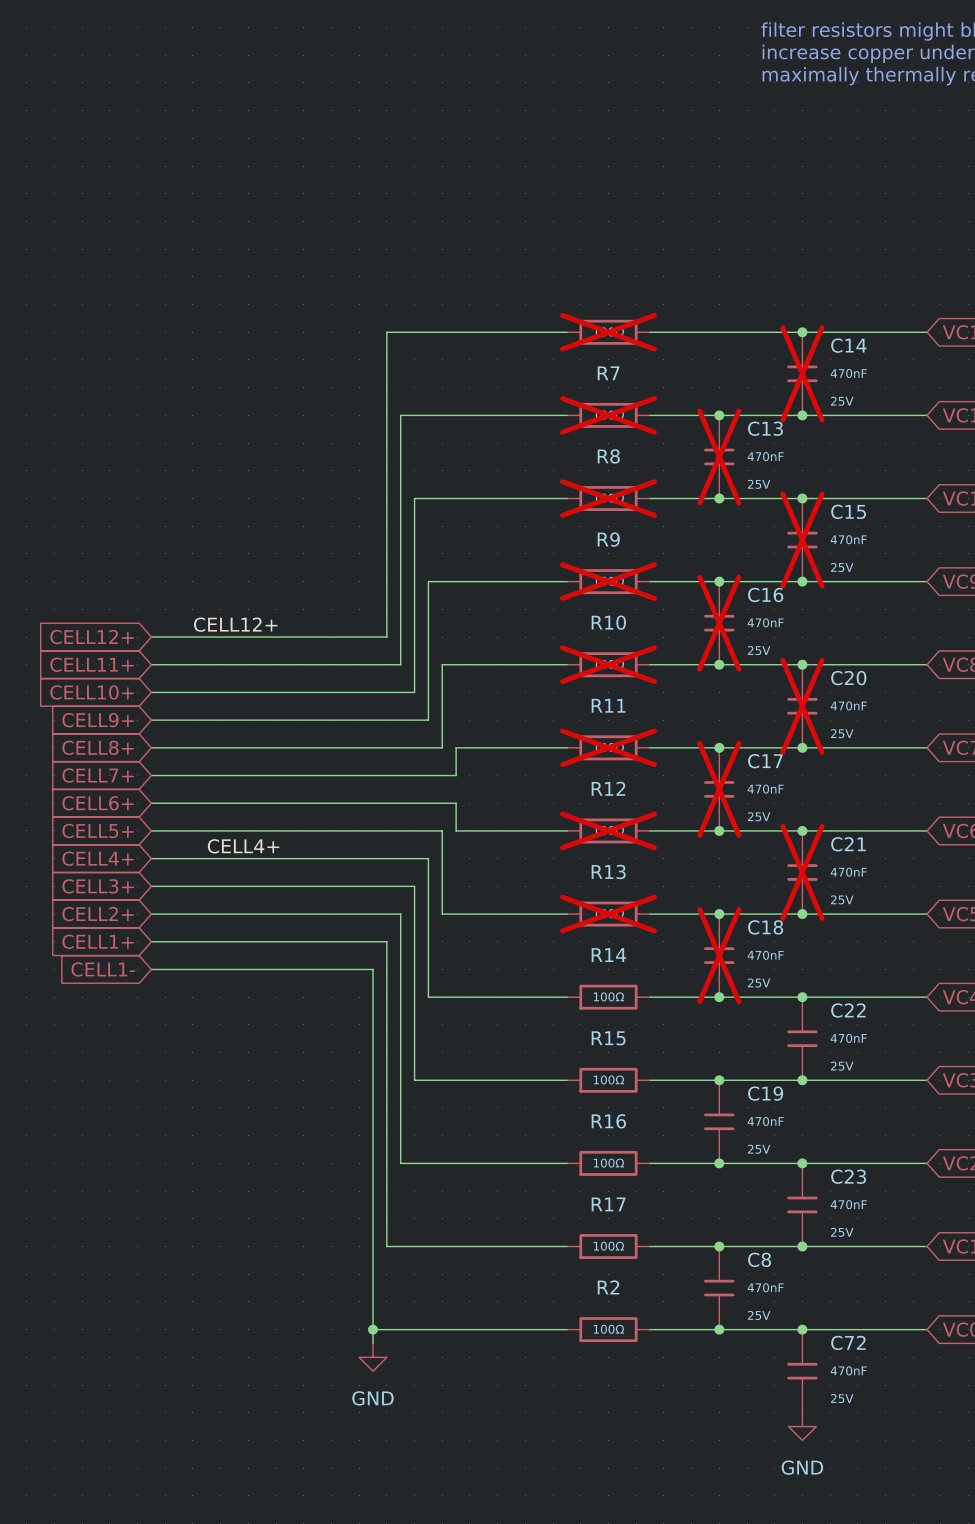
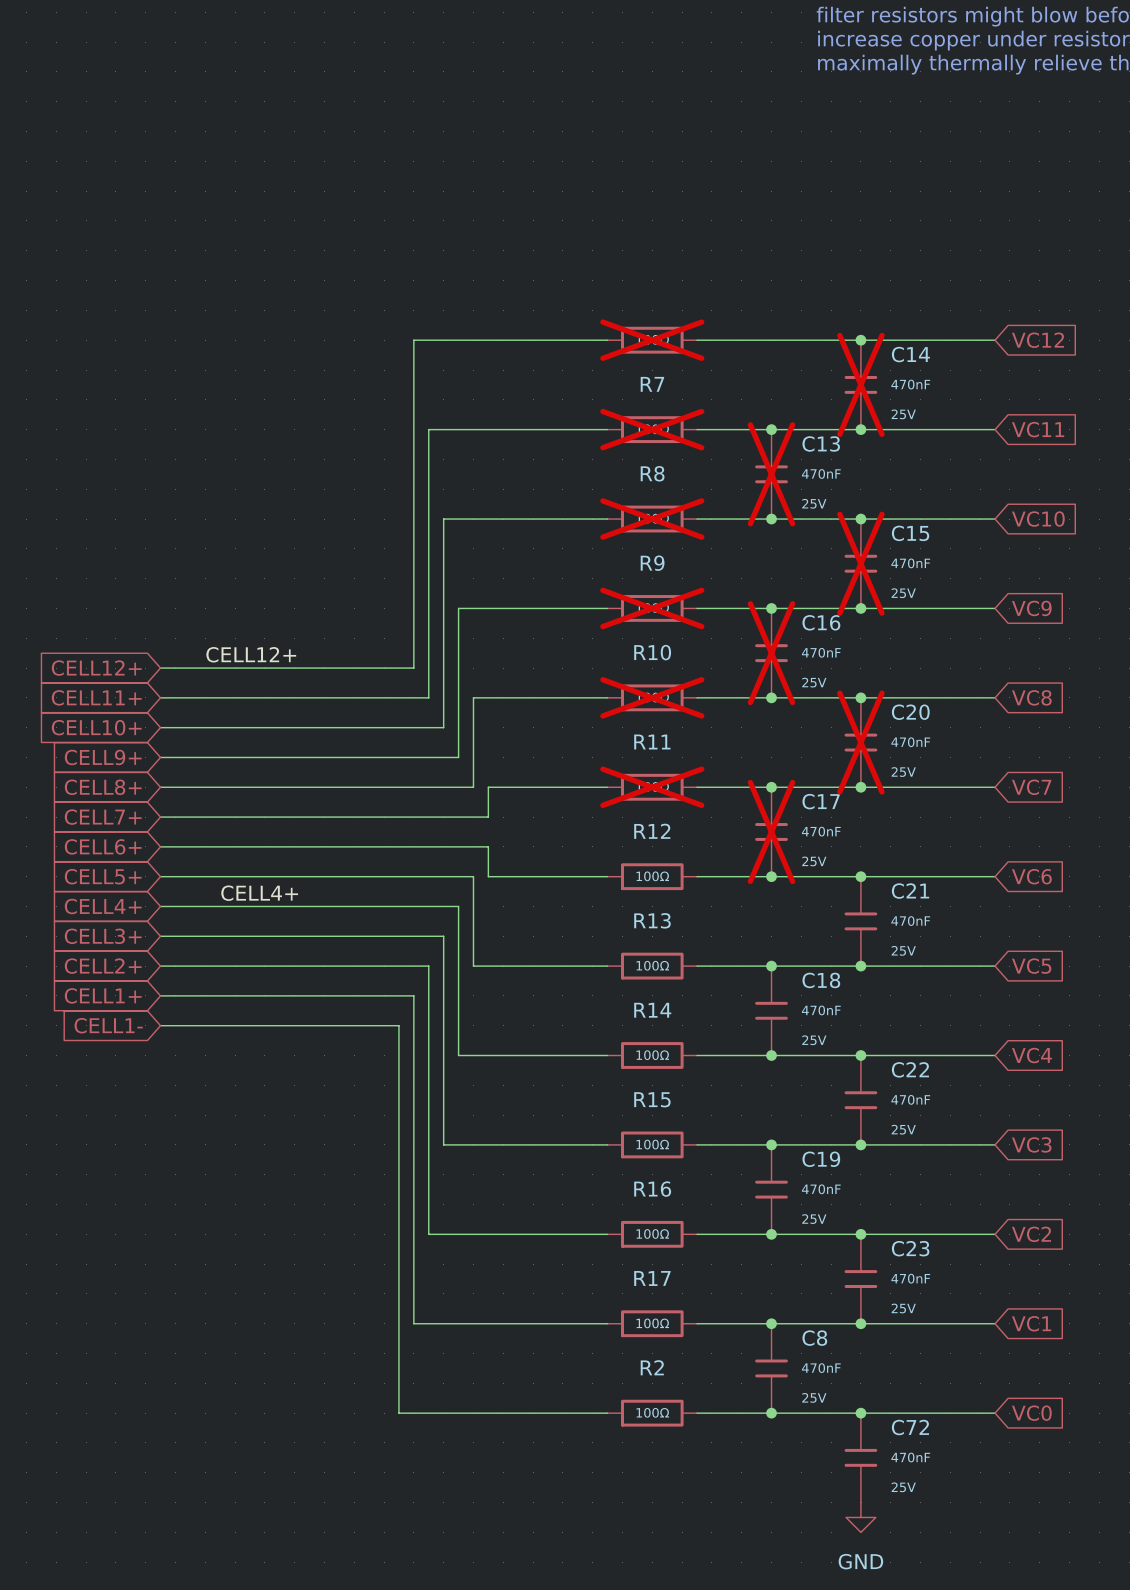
R12 do-not-place cross: (608, 830) -> none
C21 do-not-place cross: (802, 872) -> none
R13 do-not-place cross: (608, 914) -> none
C18 do-not-place cross: (719, 955) -> none
wire: (373, 1329) (373, 1343) -> none
junction: (373, 1329) -> none
power symbol: GND (373, 1357) -> none

